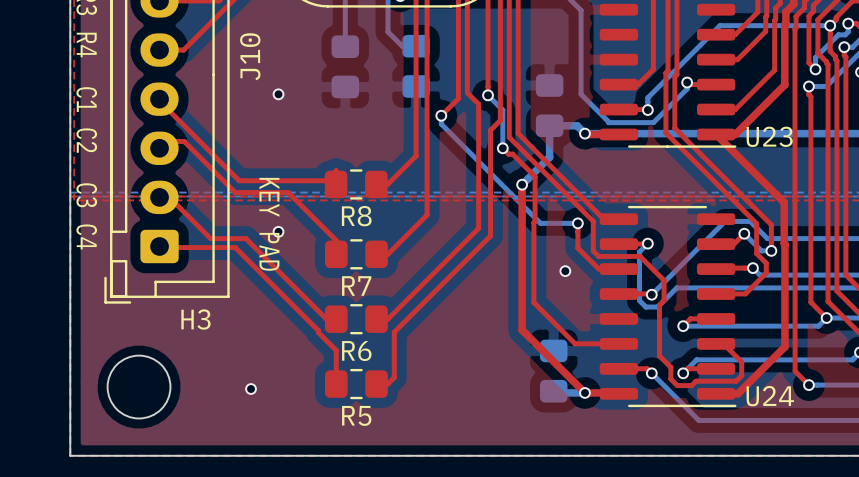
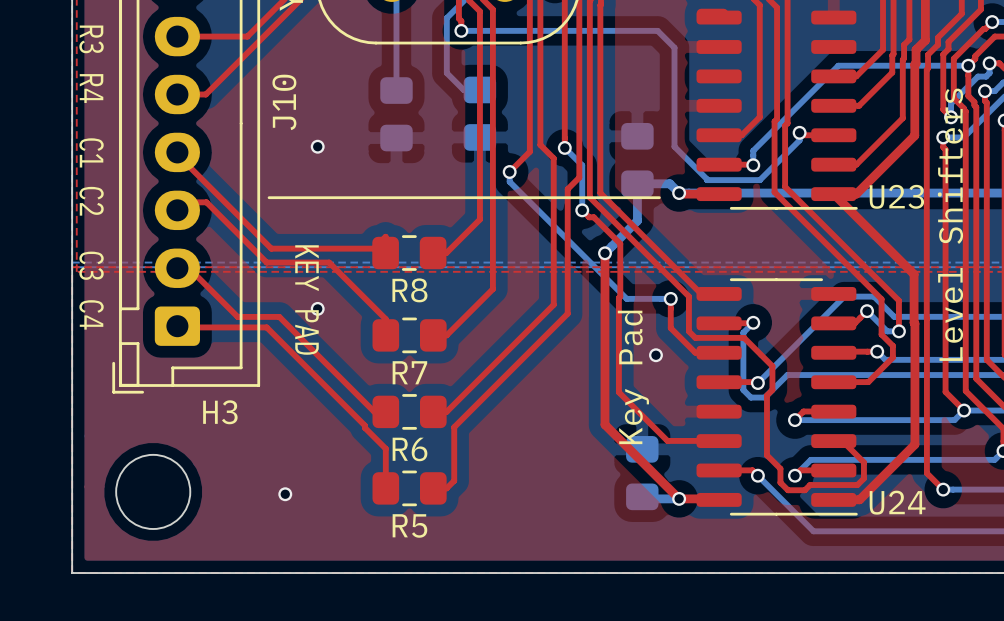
line: none -> (269, 197) (659, 197)
text: none -> Level Shifters (950, 224)
text: none -> Key Pad (633, 377)

